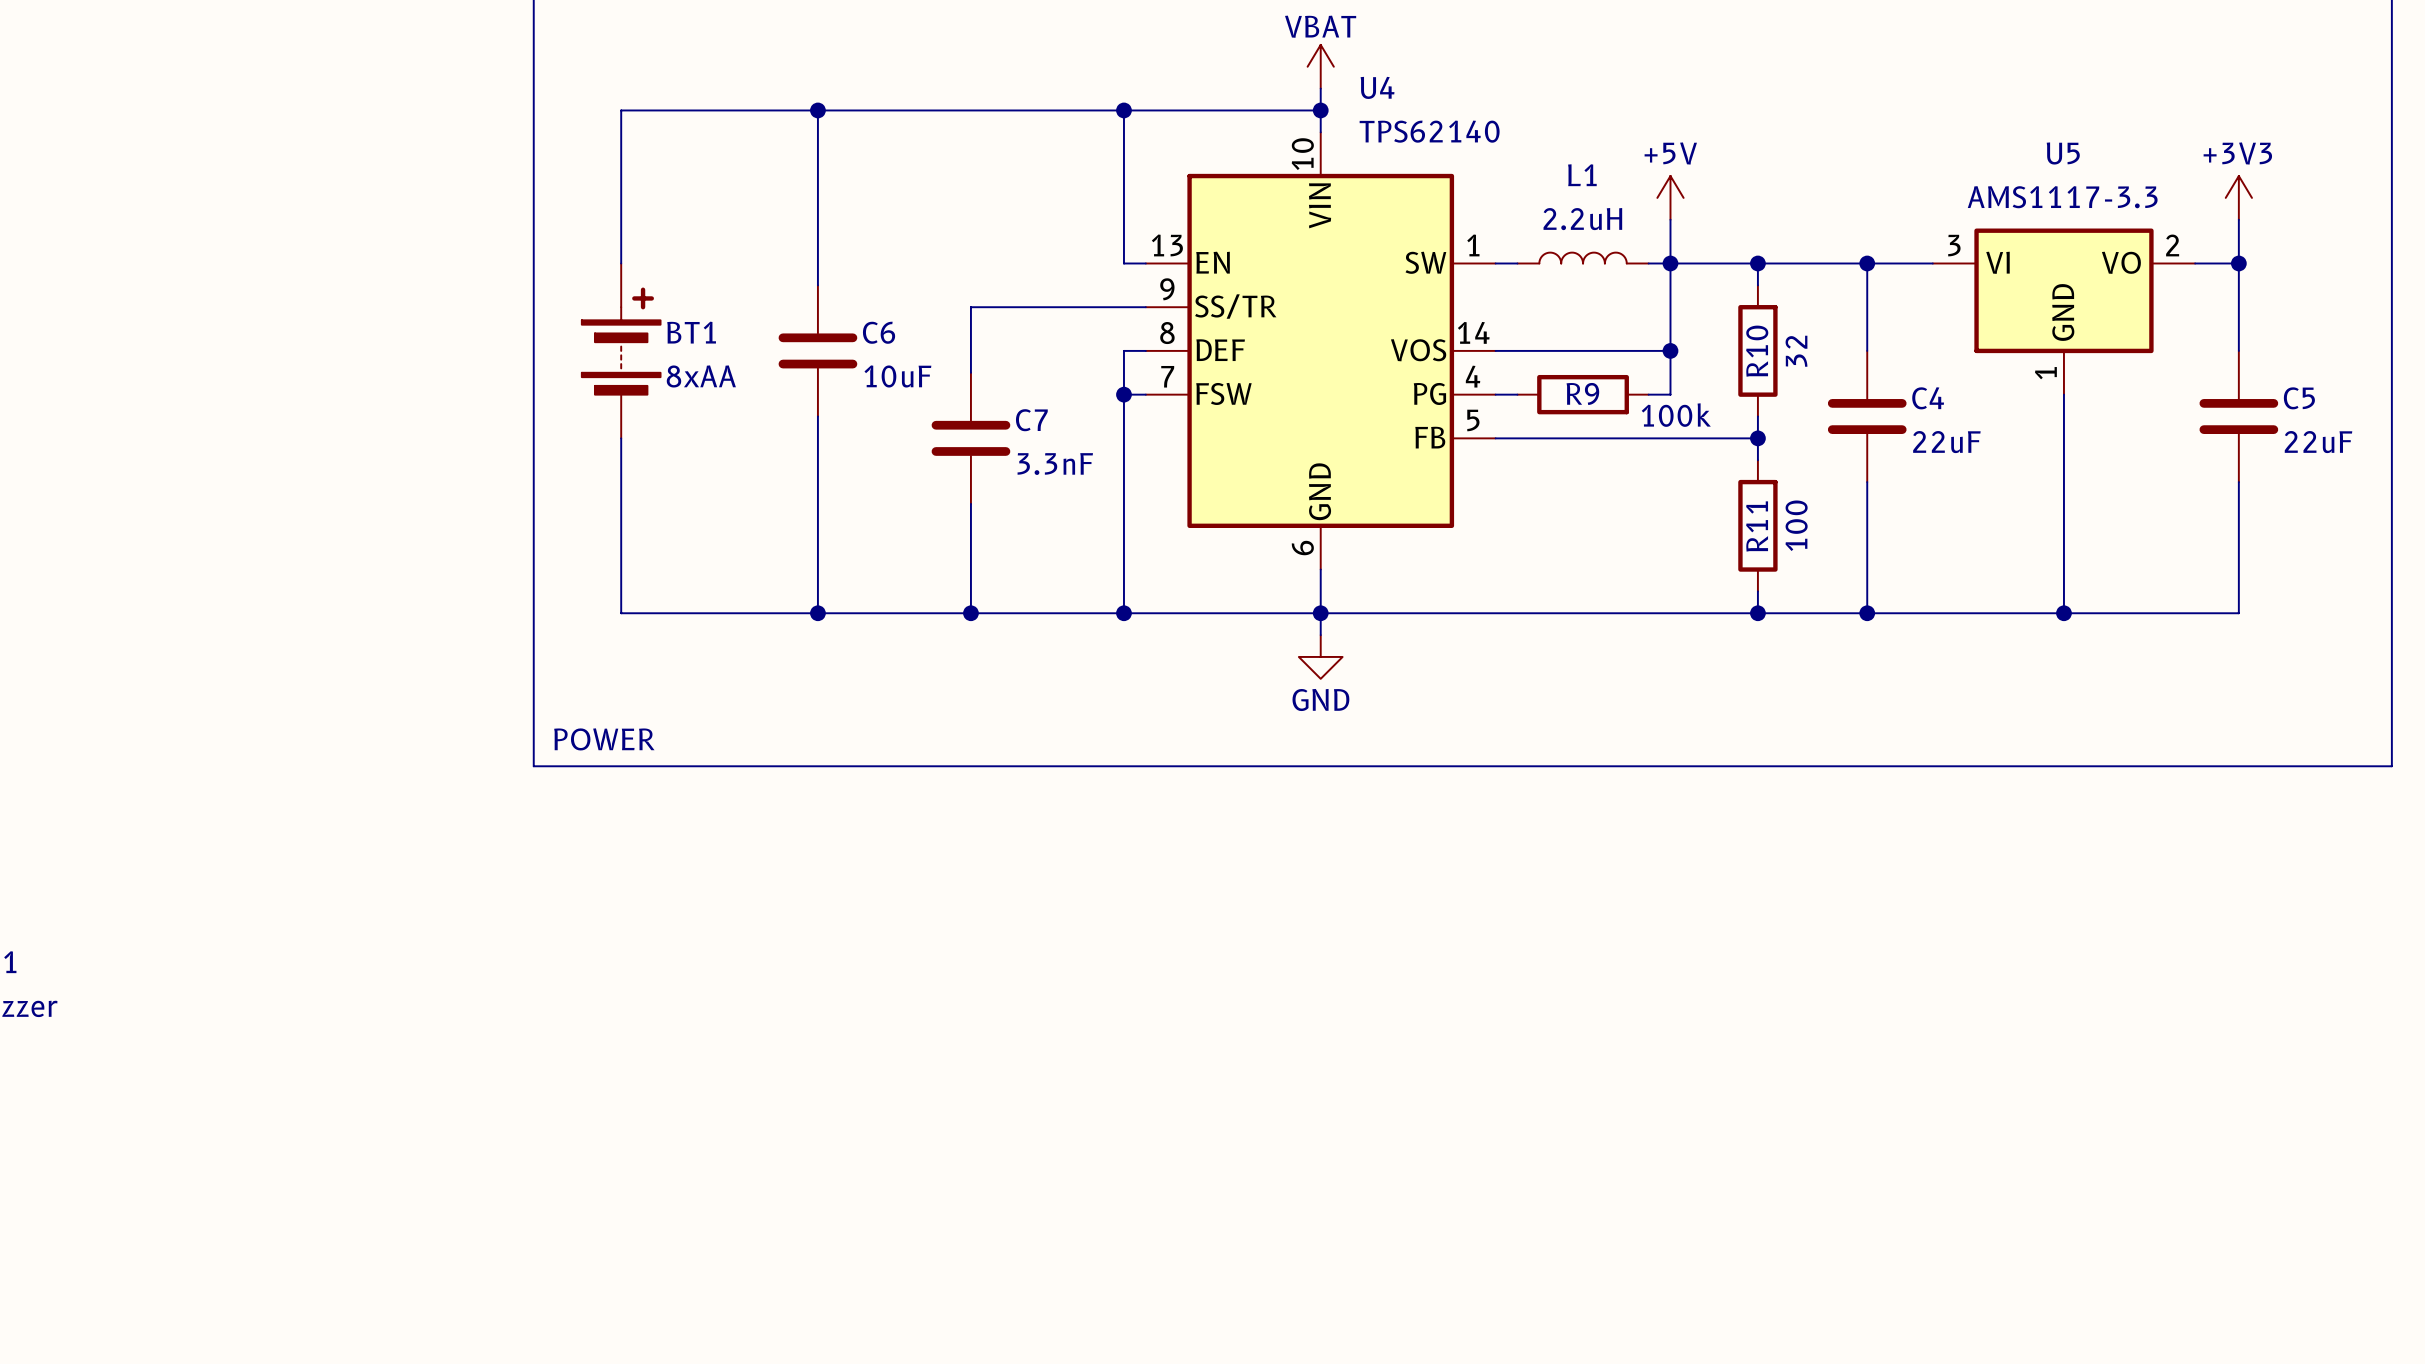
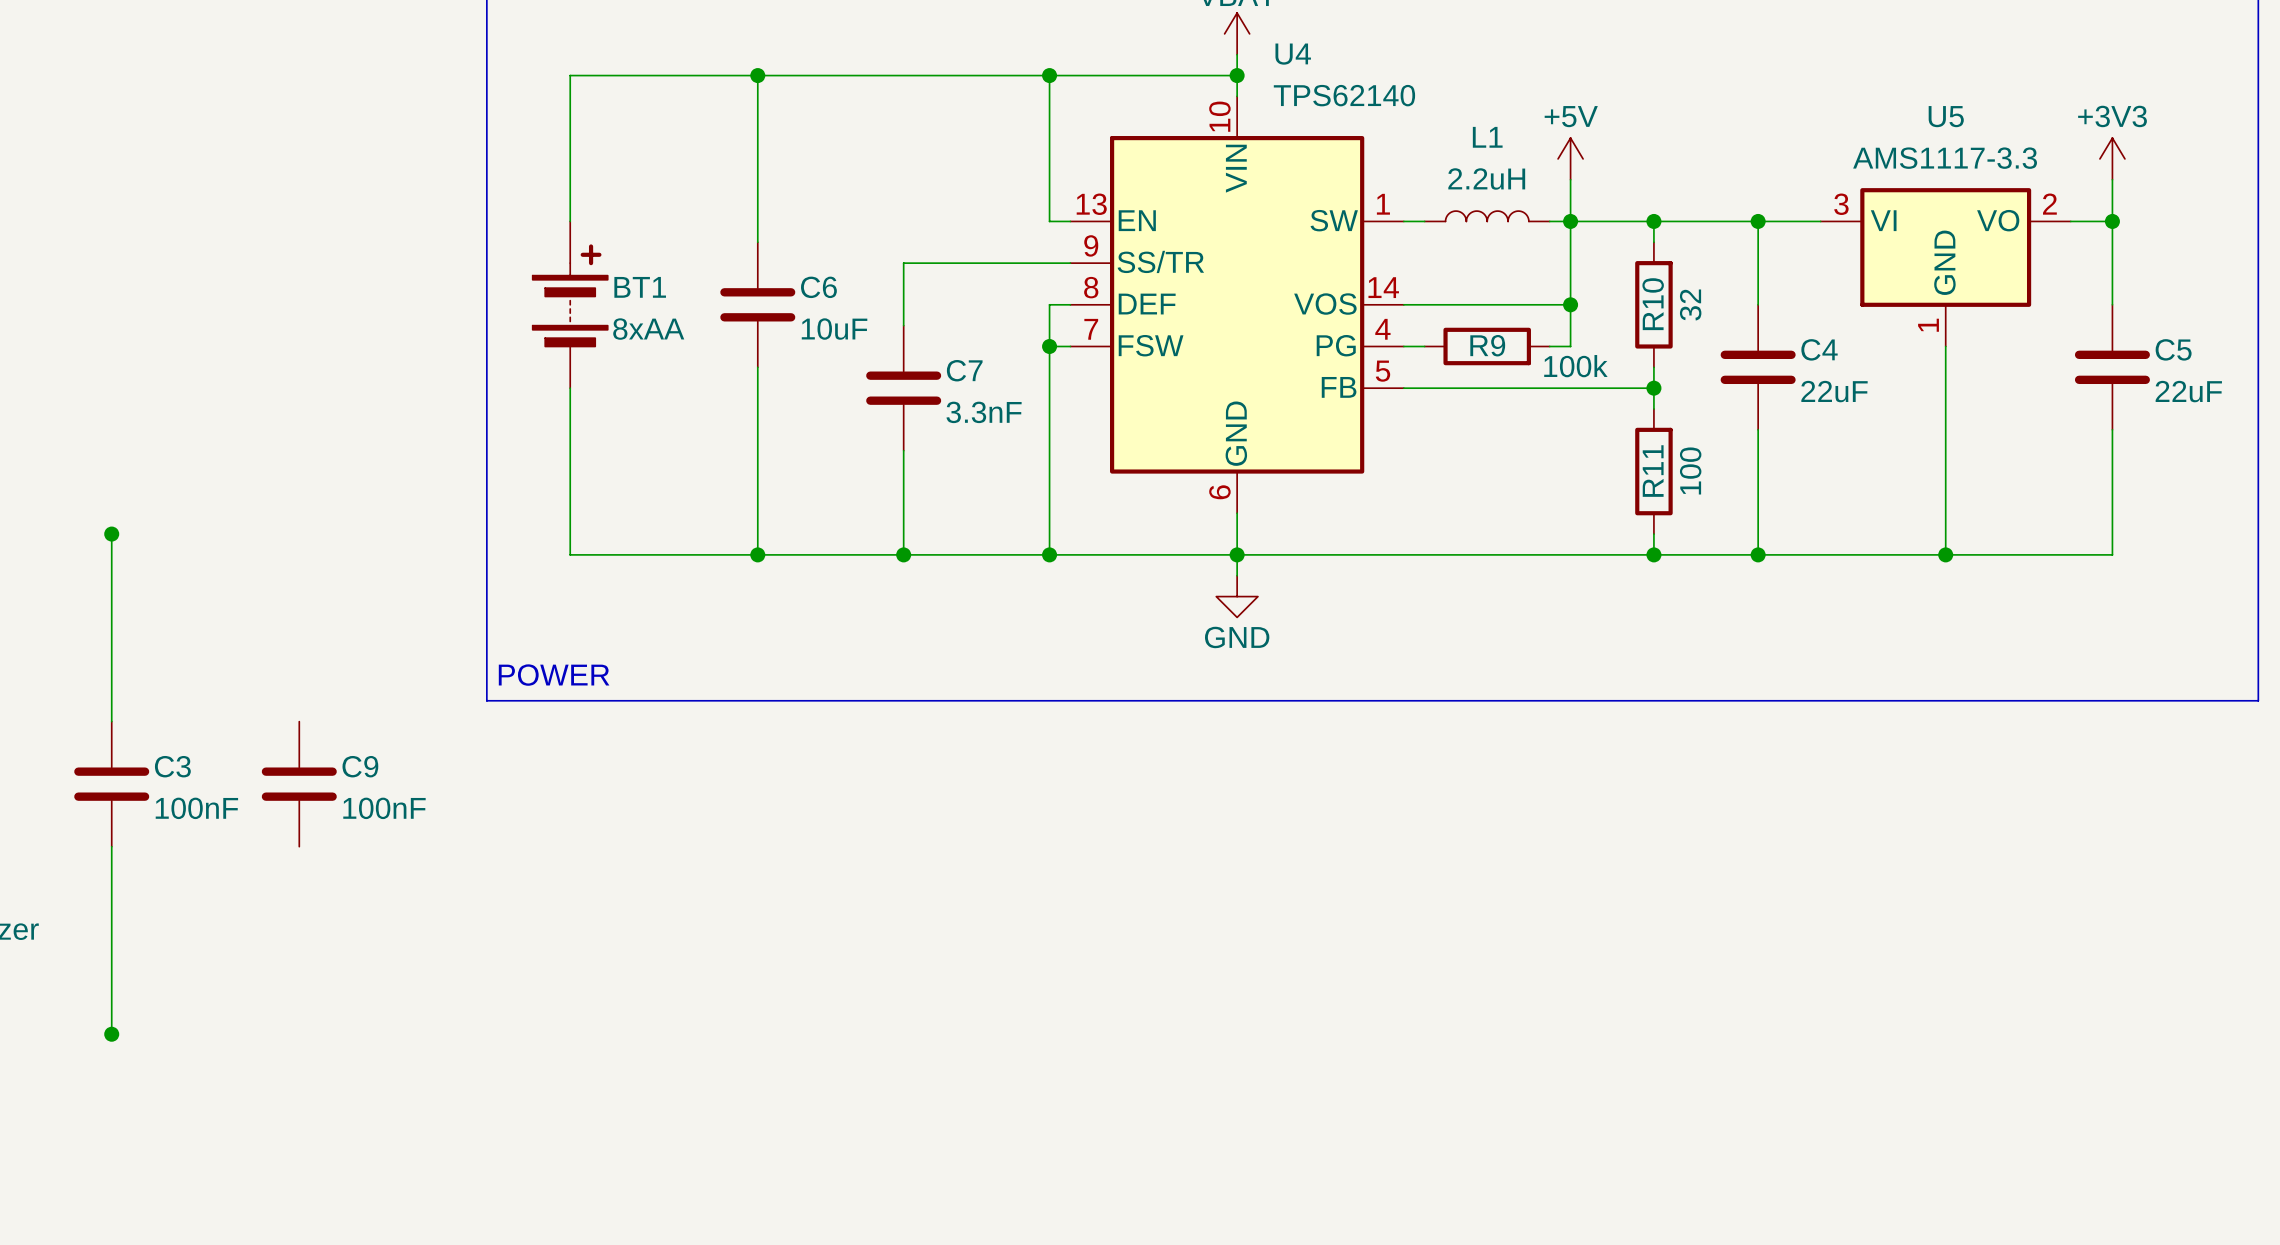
wire: none -> (111, 534) (111, 721)
junction: none -> (111, 534)
C3: none -> 100nF (111, 784)
C9: none -> 100nF (299, 784)
wire: none -> (111, 846) (111, 1034)
junction: none -> (111, 1034)

